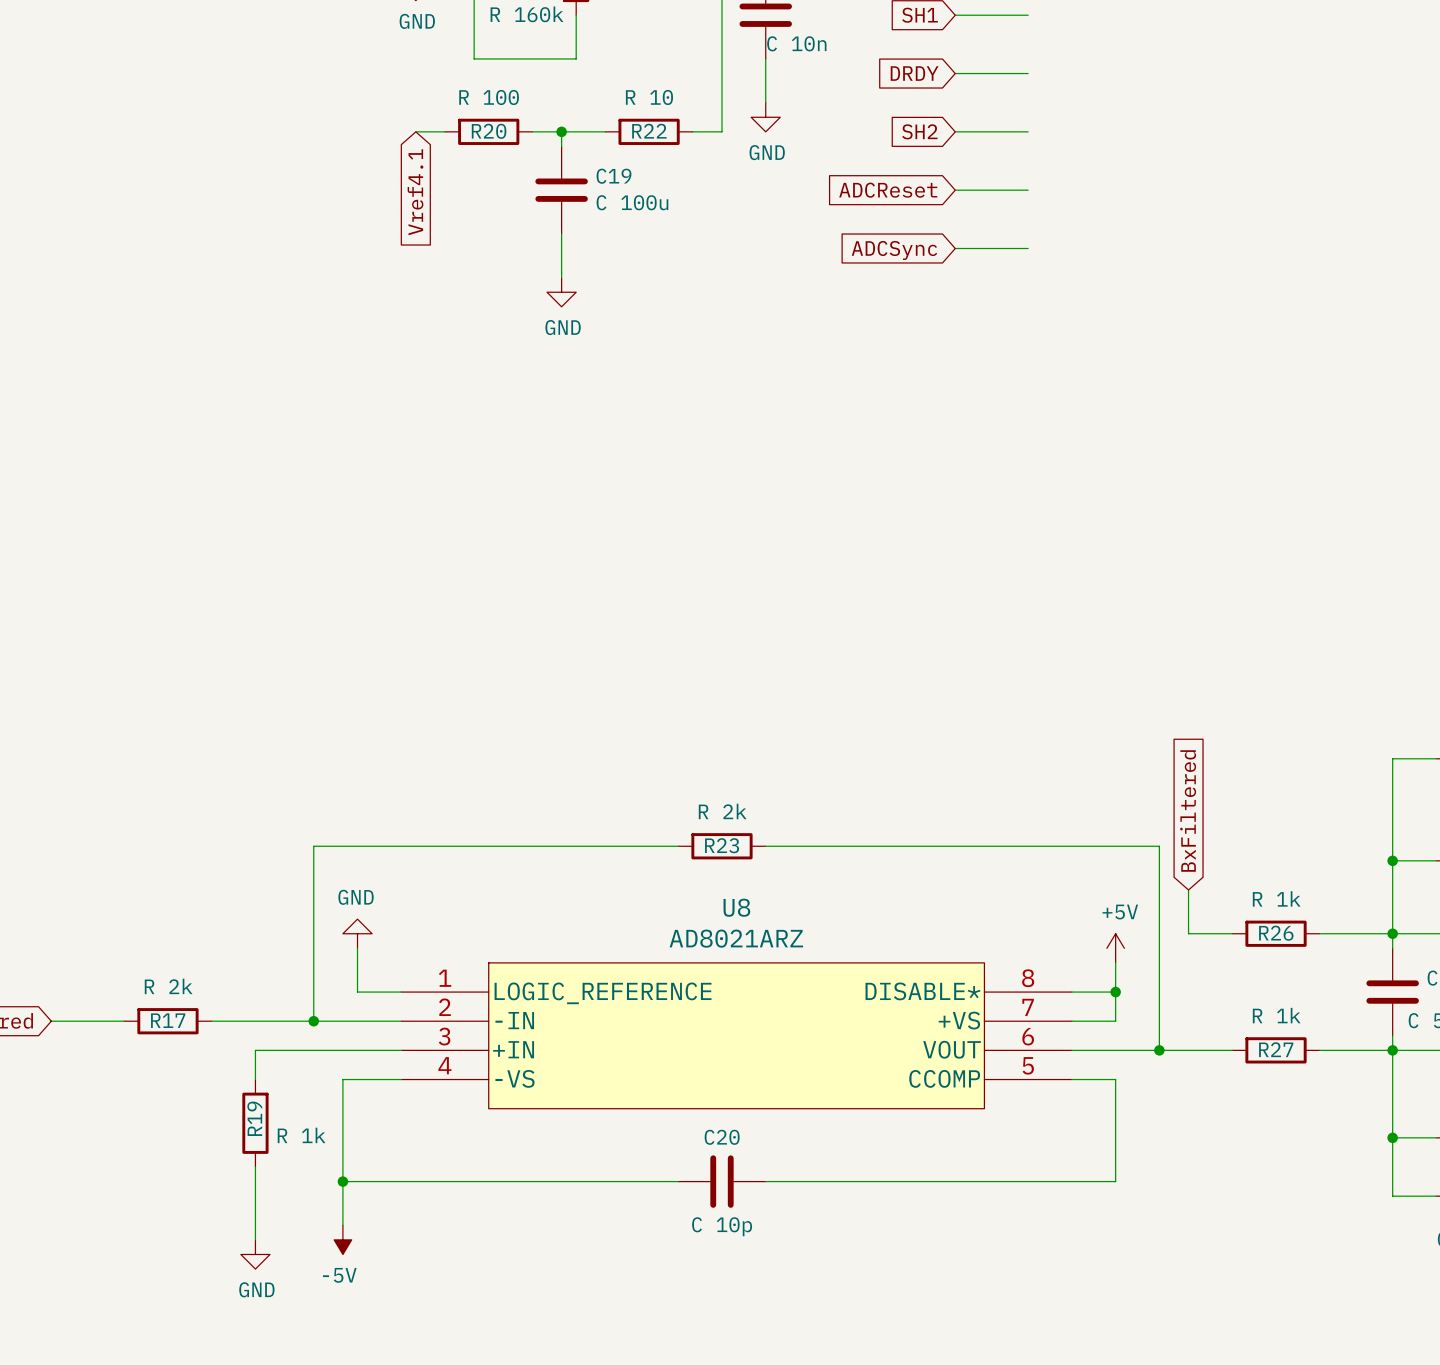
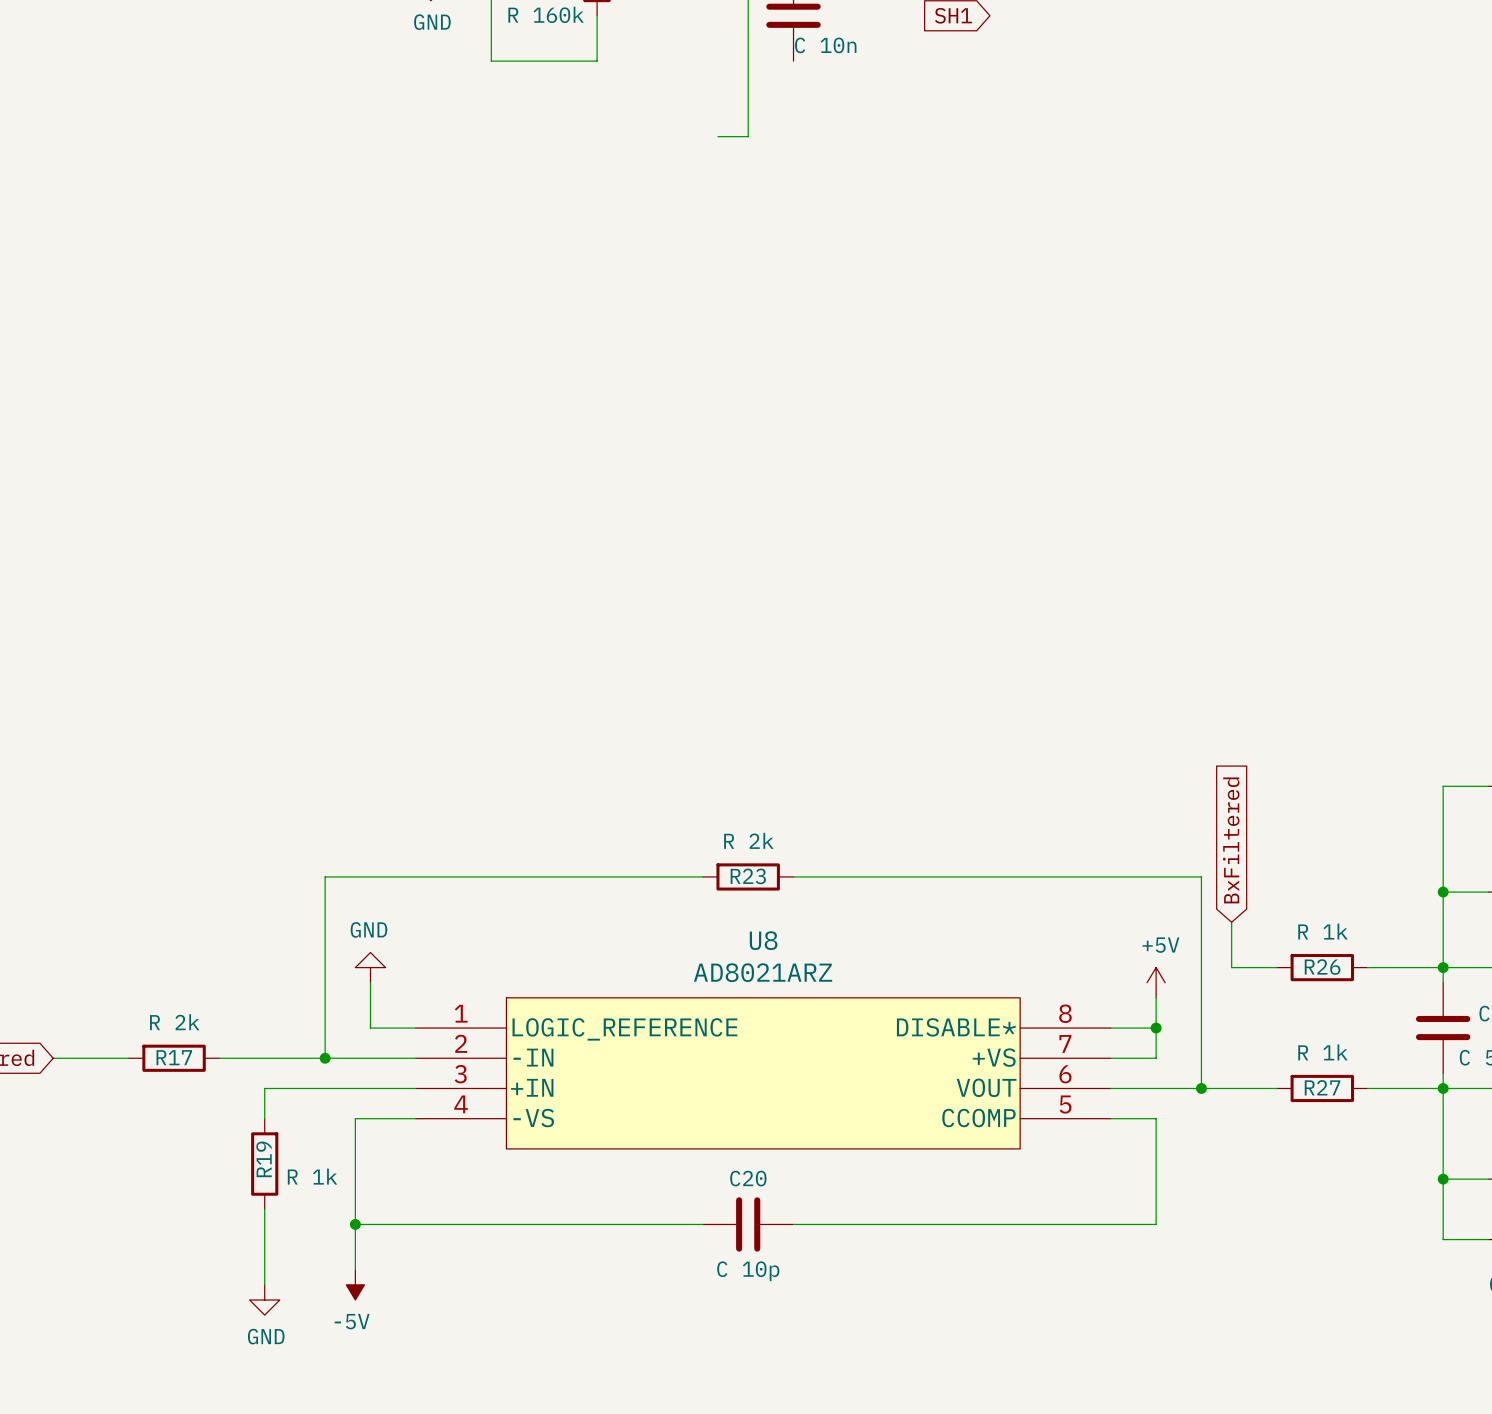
wire: (955, 15) (1028, 15) -> none
wire: (765, 58) (765, 102) -> none
global label: DRDY (914, 73) -> none
wire: (955, 73) (1028, 73) -> none
power symbol: GND (765, 117) -> none
wire: (415, 131) (444, 131) -> none
R20: R 100 (488, 131) -> none
wire: (532, 131) (605, 131) -> none
wire: (561, 131) (561, 146) -> none
junction: (561, 131) -> none
R22: R 10 (649, 131) -> none
global label: SH2 (919, 131) -> none
wire: (955, 131) (1028, 131) -> none
C19: C 100u (561, 190) -> none
global label: ADCReset (888, 190) -> none
wire: (955, 190) (1028, 190) -> none
global label: Vref4.1 (415, 192) -> none
wire: (561, 233) (561, 277) -> none
wire: (955, 248) (1028, 248) -> none
global label: ADCSync (894, 250) -> none
power symbol: GND (561, 292) -> none

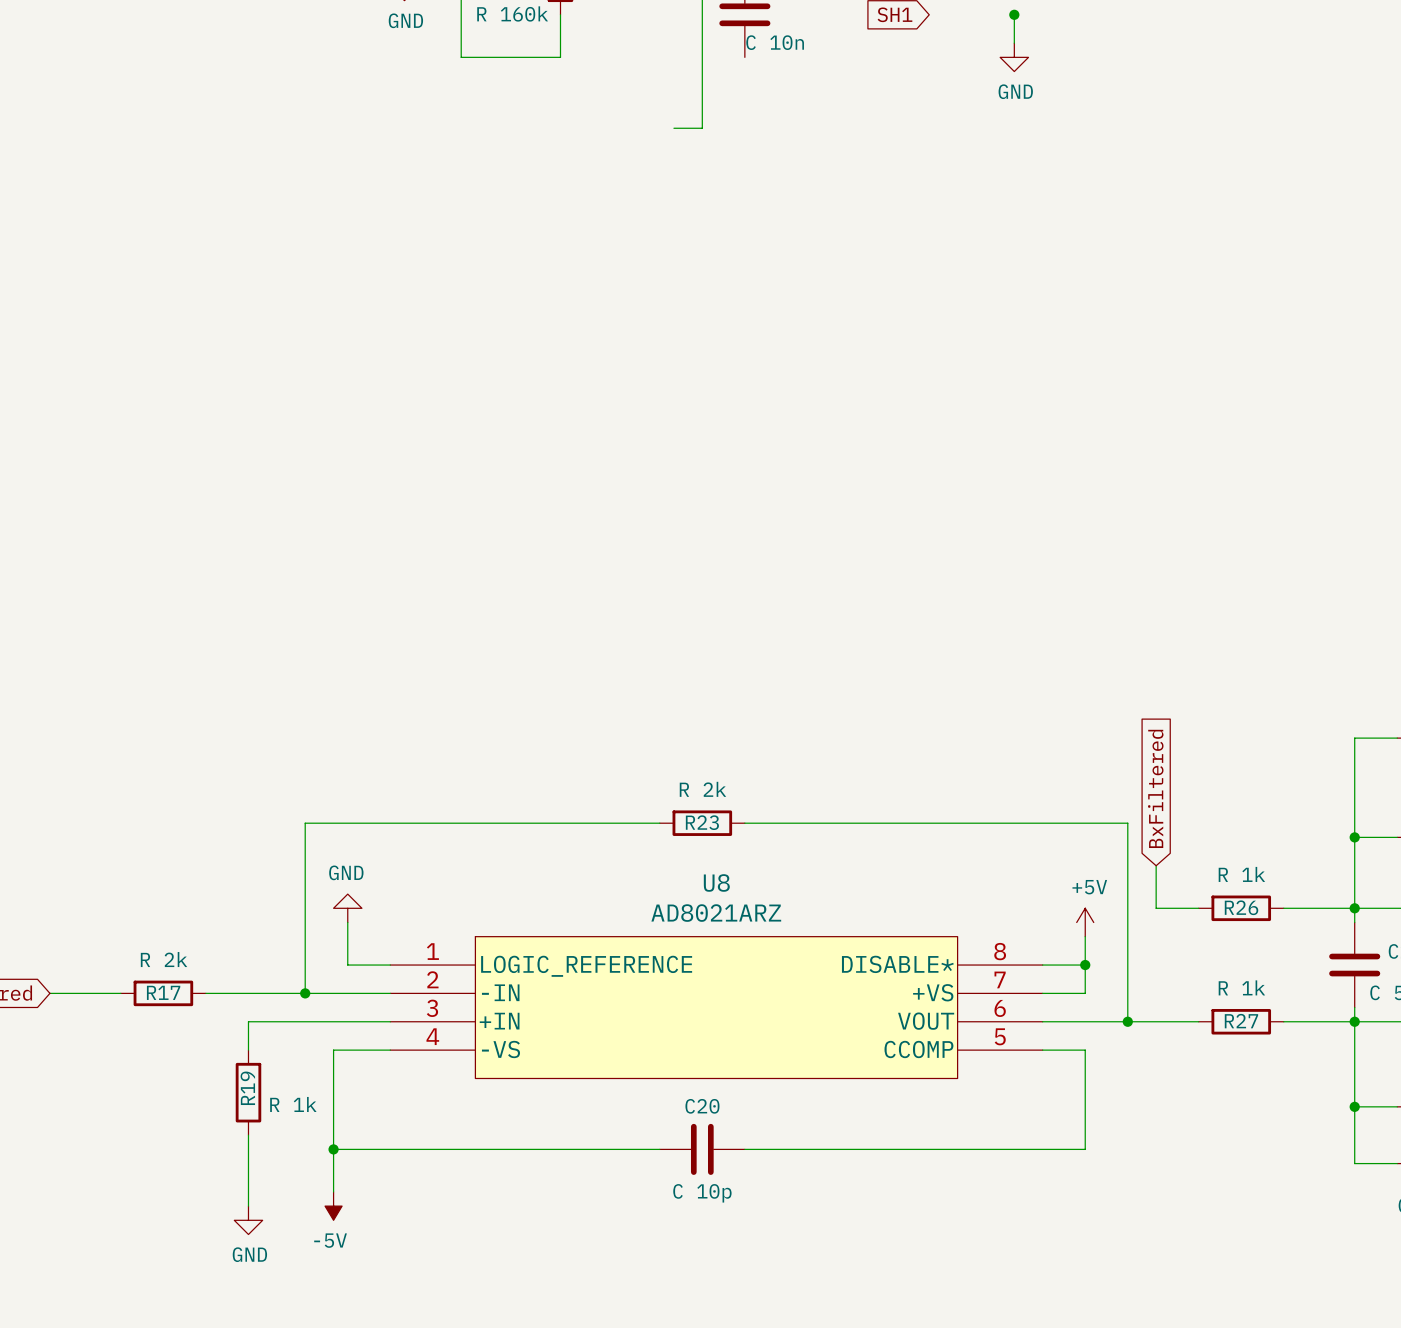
wire: none -> (1014, 14) (1014, 43)
junction: none -> (1014, 14)
power symbol: none -> GND (1014, 57)

